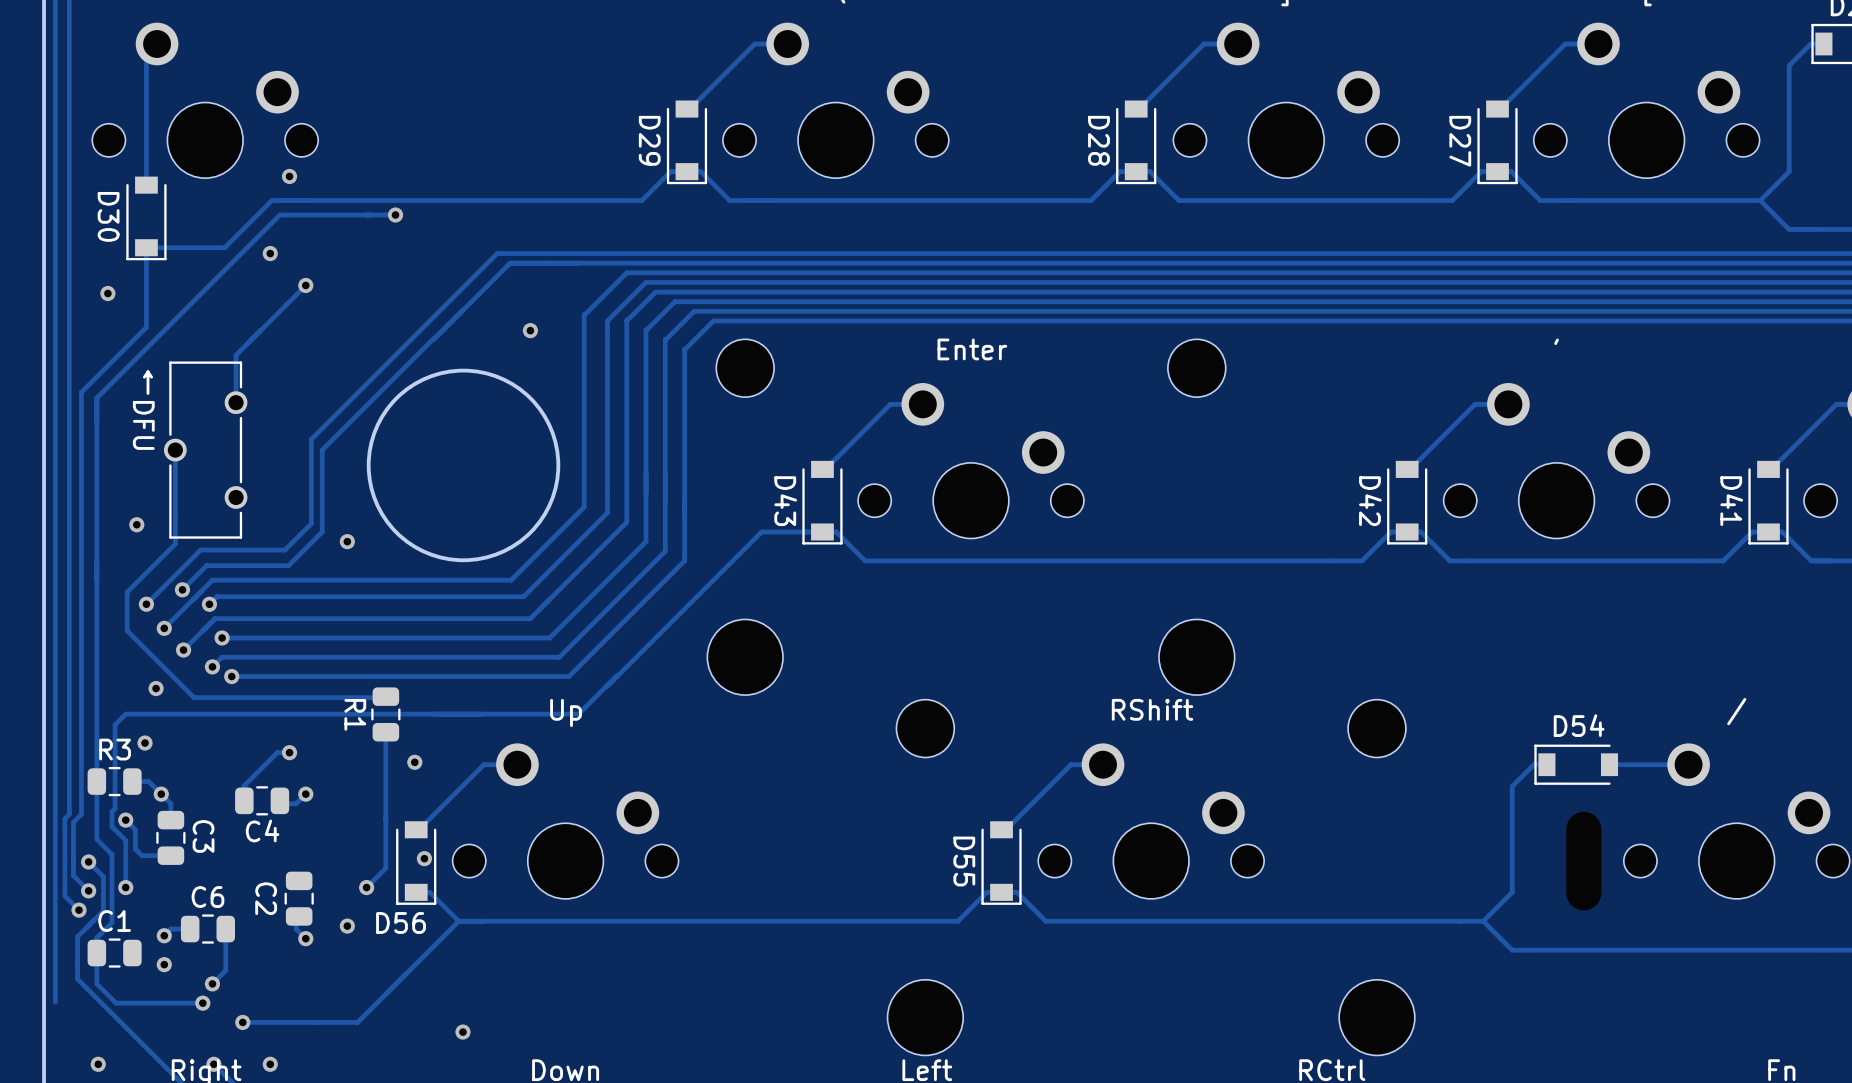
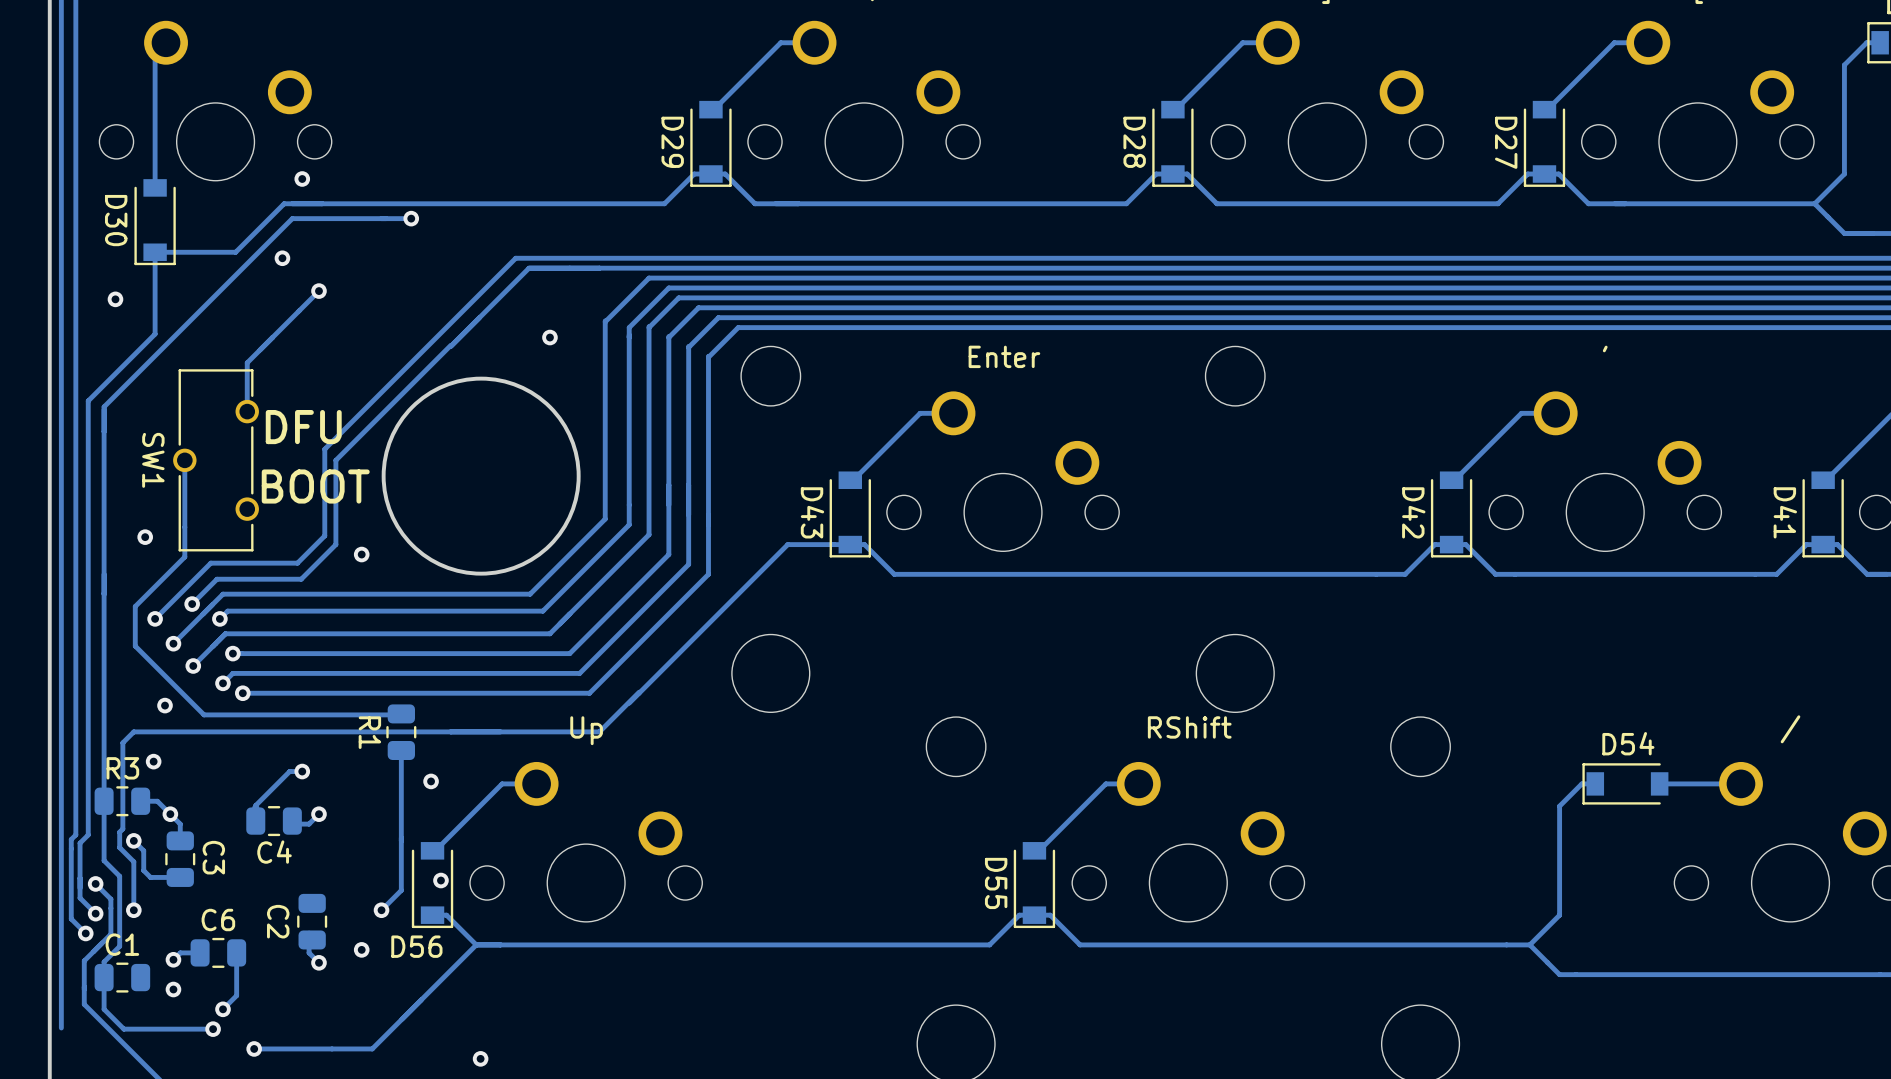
text: → (147, 382) -> none
text: none -> DFU (303, 427)
SW1 value: DFU (143, 425) -> none
SW1 name: none -> SW1 (153, 460)
text: none -> BOOT (315, 486)

